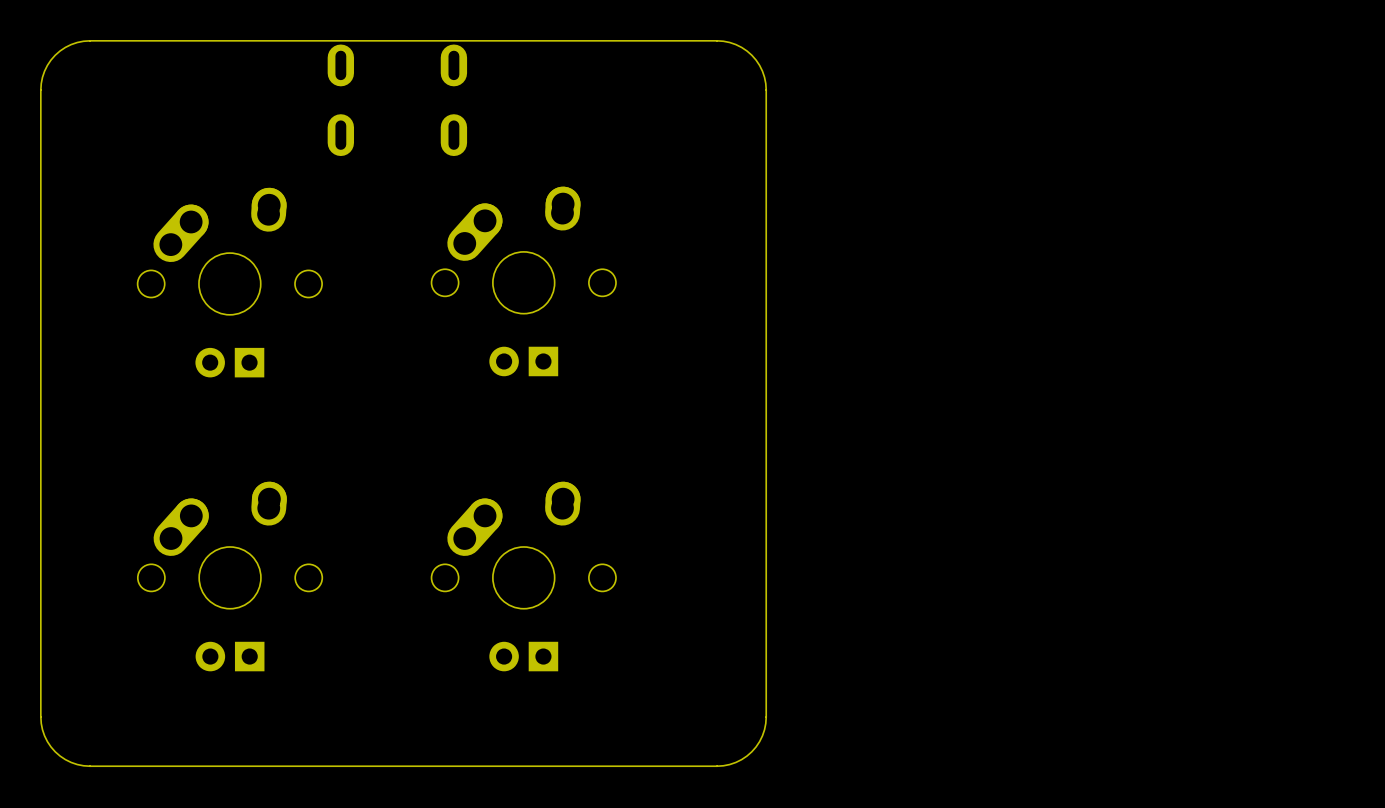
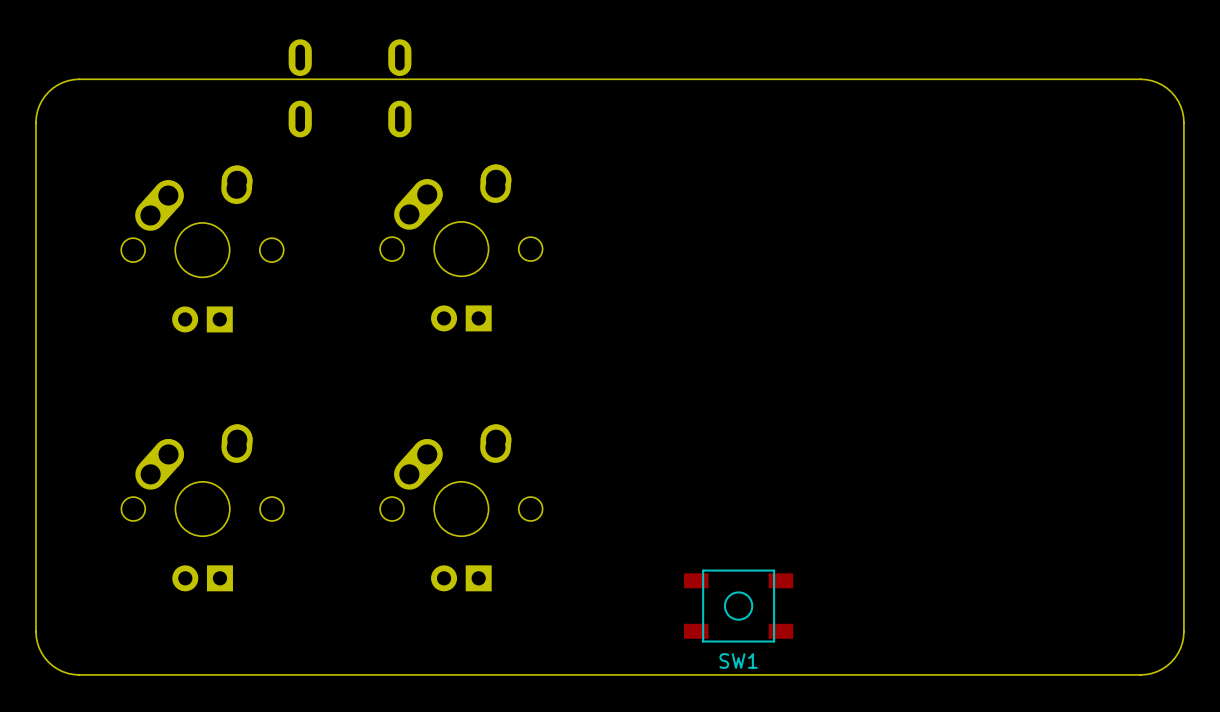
board edge: (40, 139) (40, 90) (44, 71) (51, 60) (60, 51) (71, 44) (83, 41) (717, 40) (735, 44) (751, 55) (762, 71) (766, 90) (766, 717) (762, 735) (751, 751) (735, 762) (717, 766) -> (35, 122) (39, 106) (48, 91) (62, 82) (79, 79) (1140, 79) (1157, 82) (1171, 91) (1180, 106) (1183, 122) (1183, 631) (1180, 648) (1171, 662) (1157, 671) (1140, 674) (631, 674)
SW1: none -> (738, 606)

